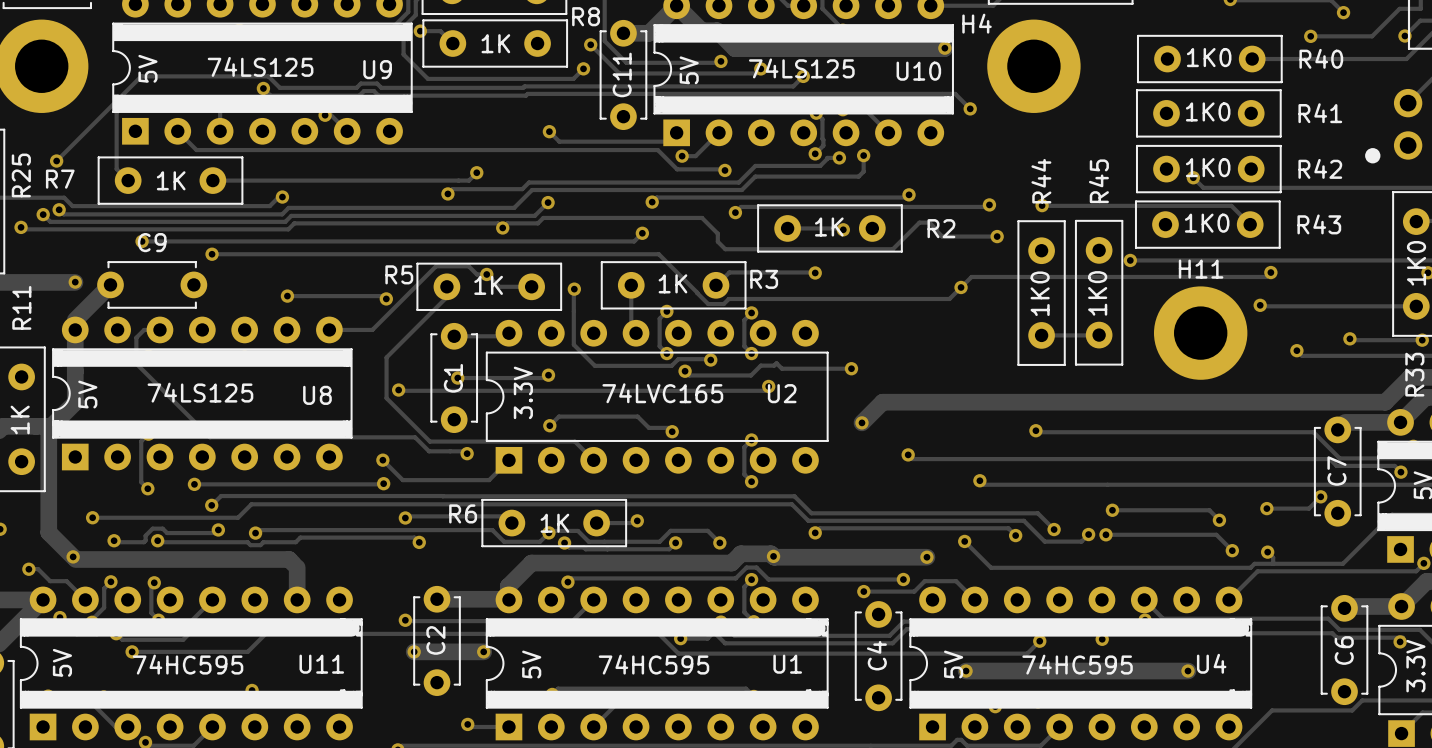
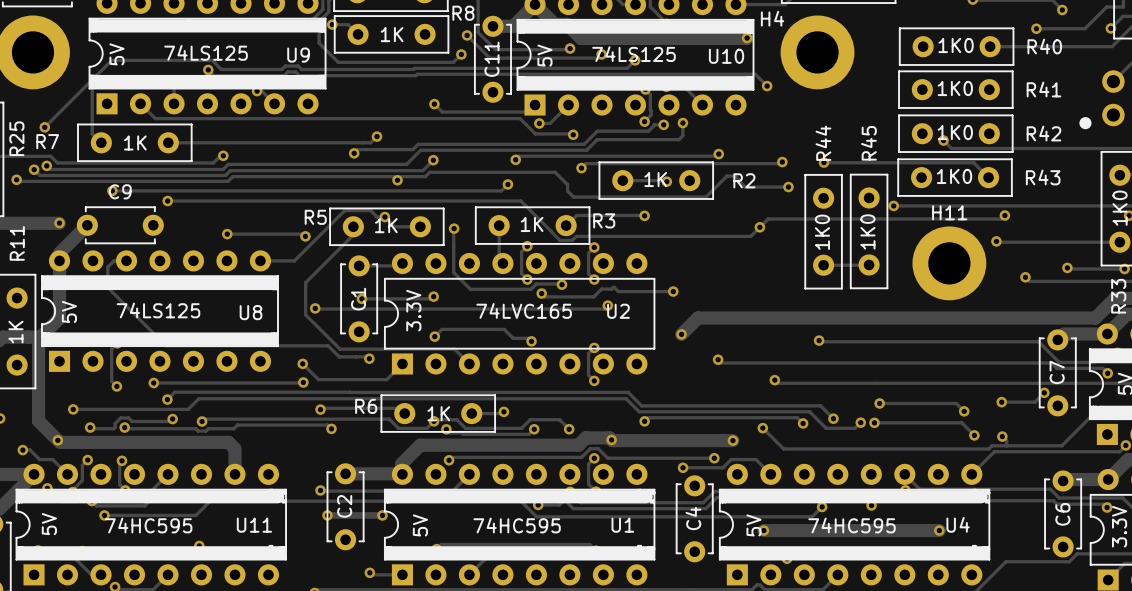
track width: thick (414, 651) (483, 651) -> thin (327, 515) (382, 515)

